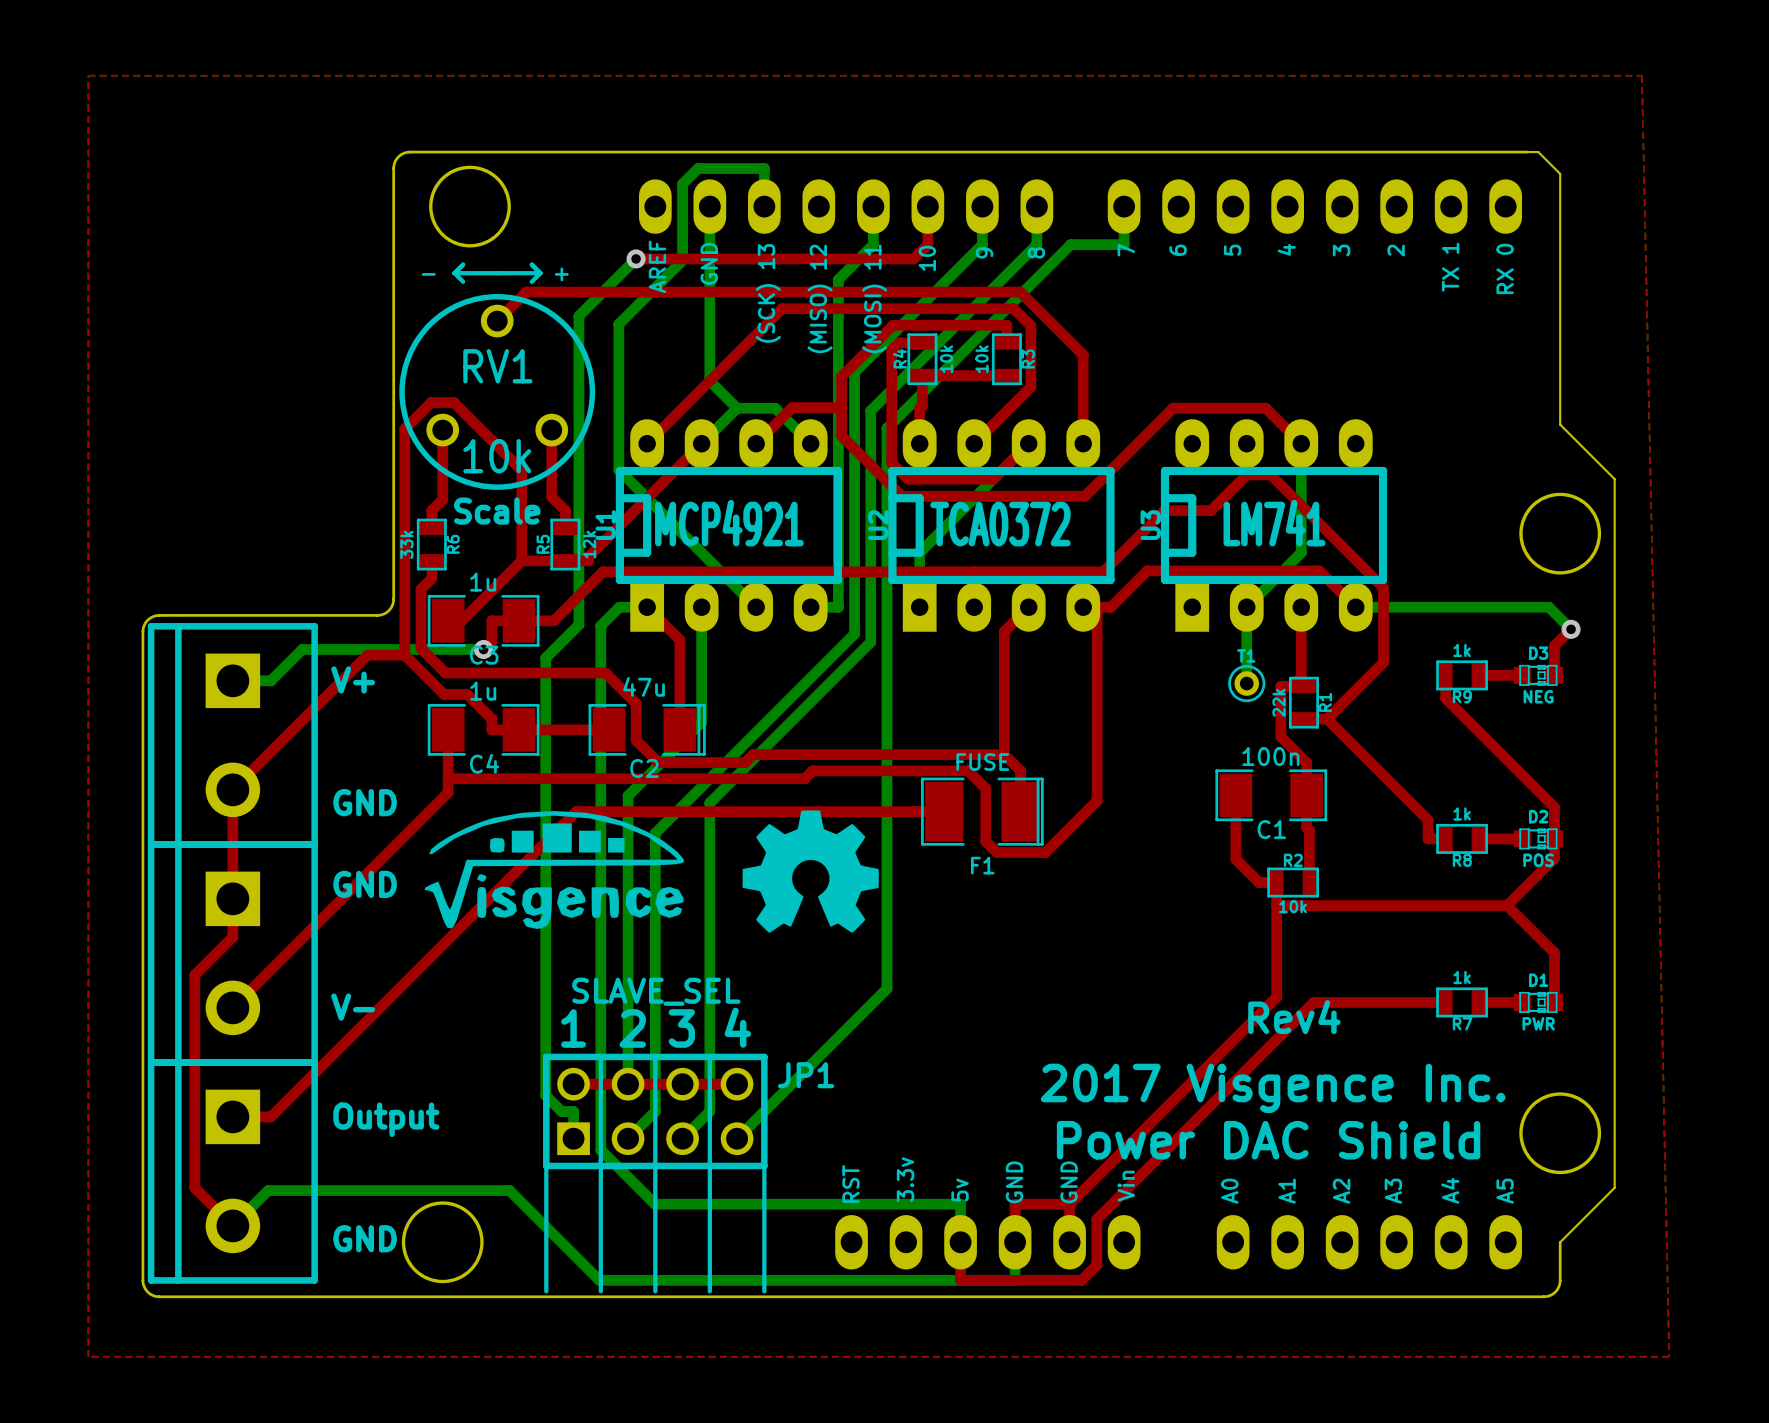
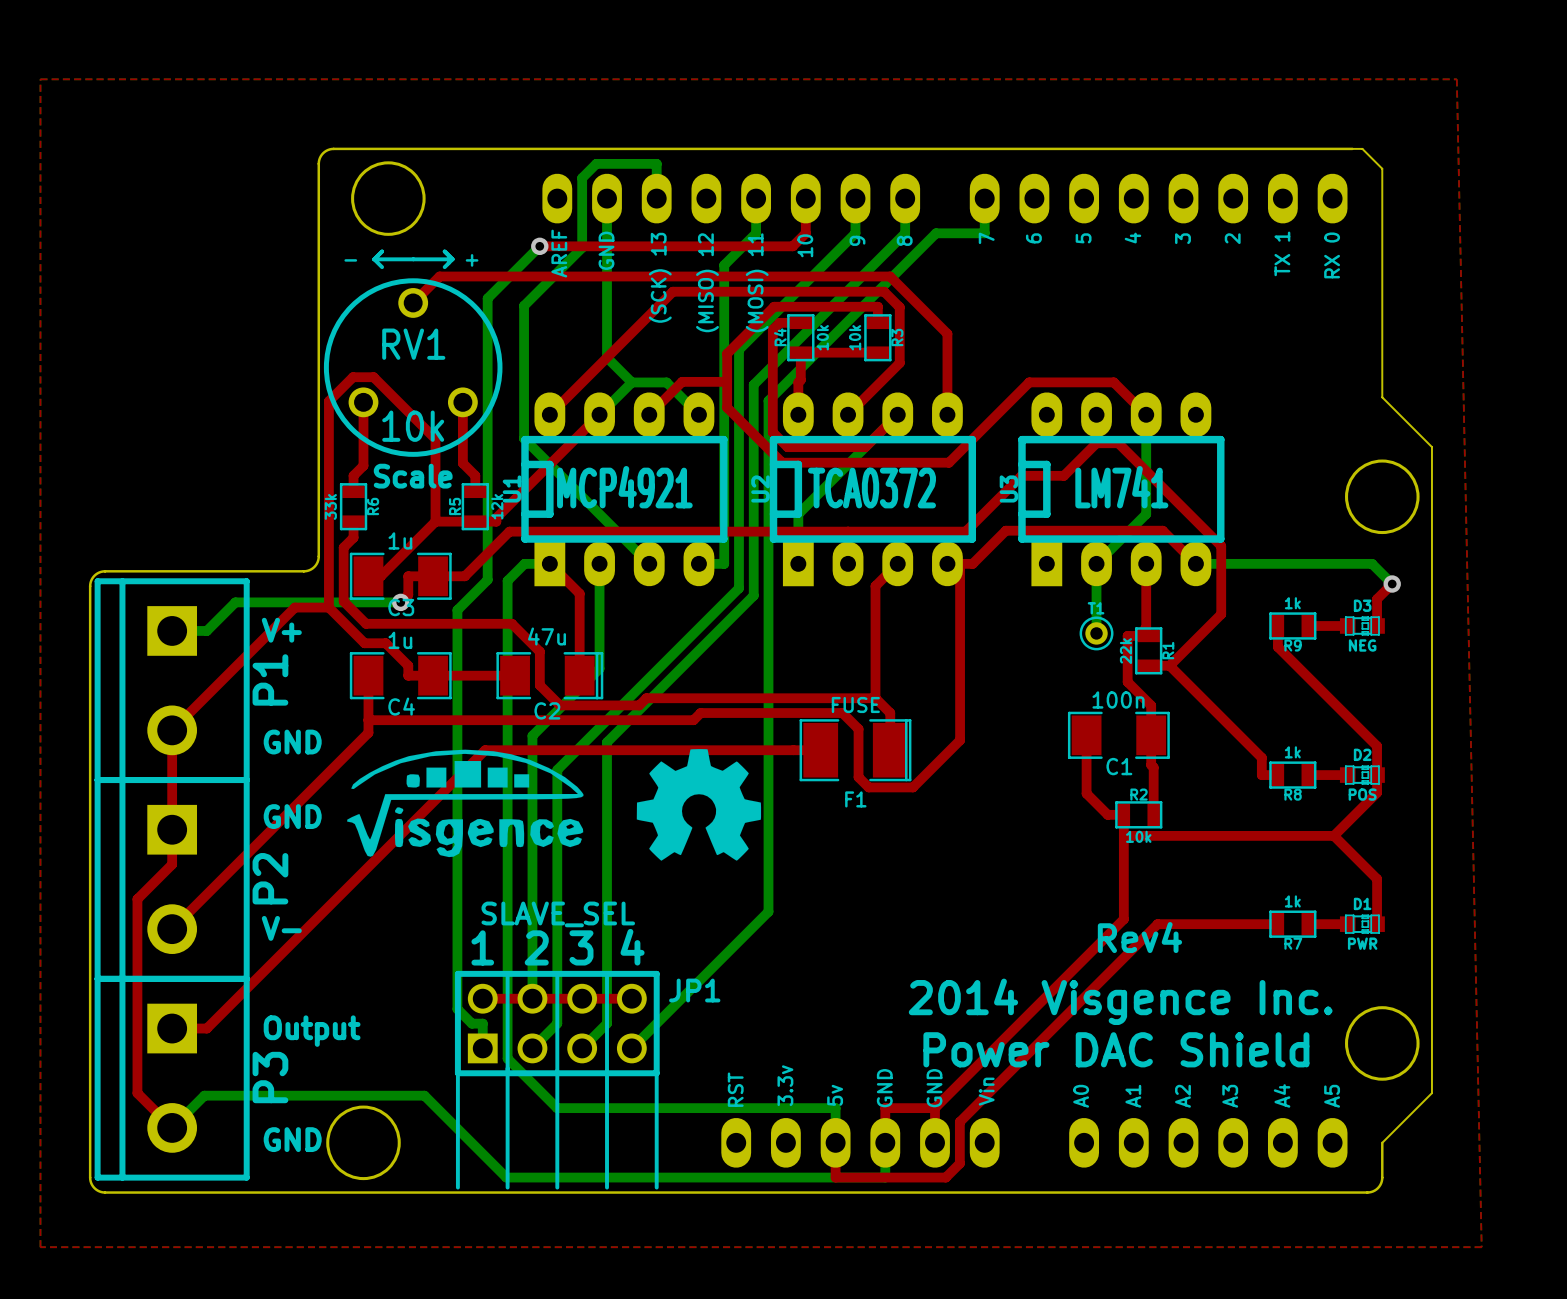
P1 name: none -> P1 (270, 679)
P2 name: none -> P2 (270, 878)
text: 2017 Visgence Inc. (1273, 1088) -> 2014 Visgence Inc. (1120, 1001)
P3 name: none -> P3 (270, 1077)

